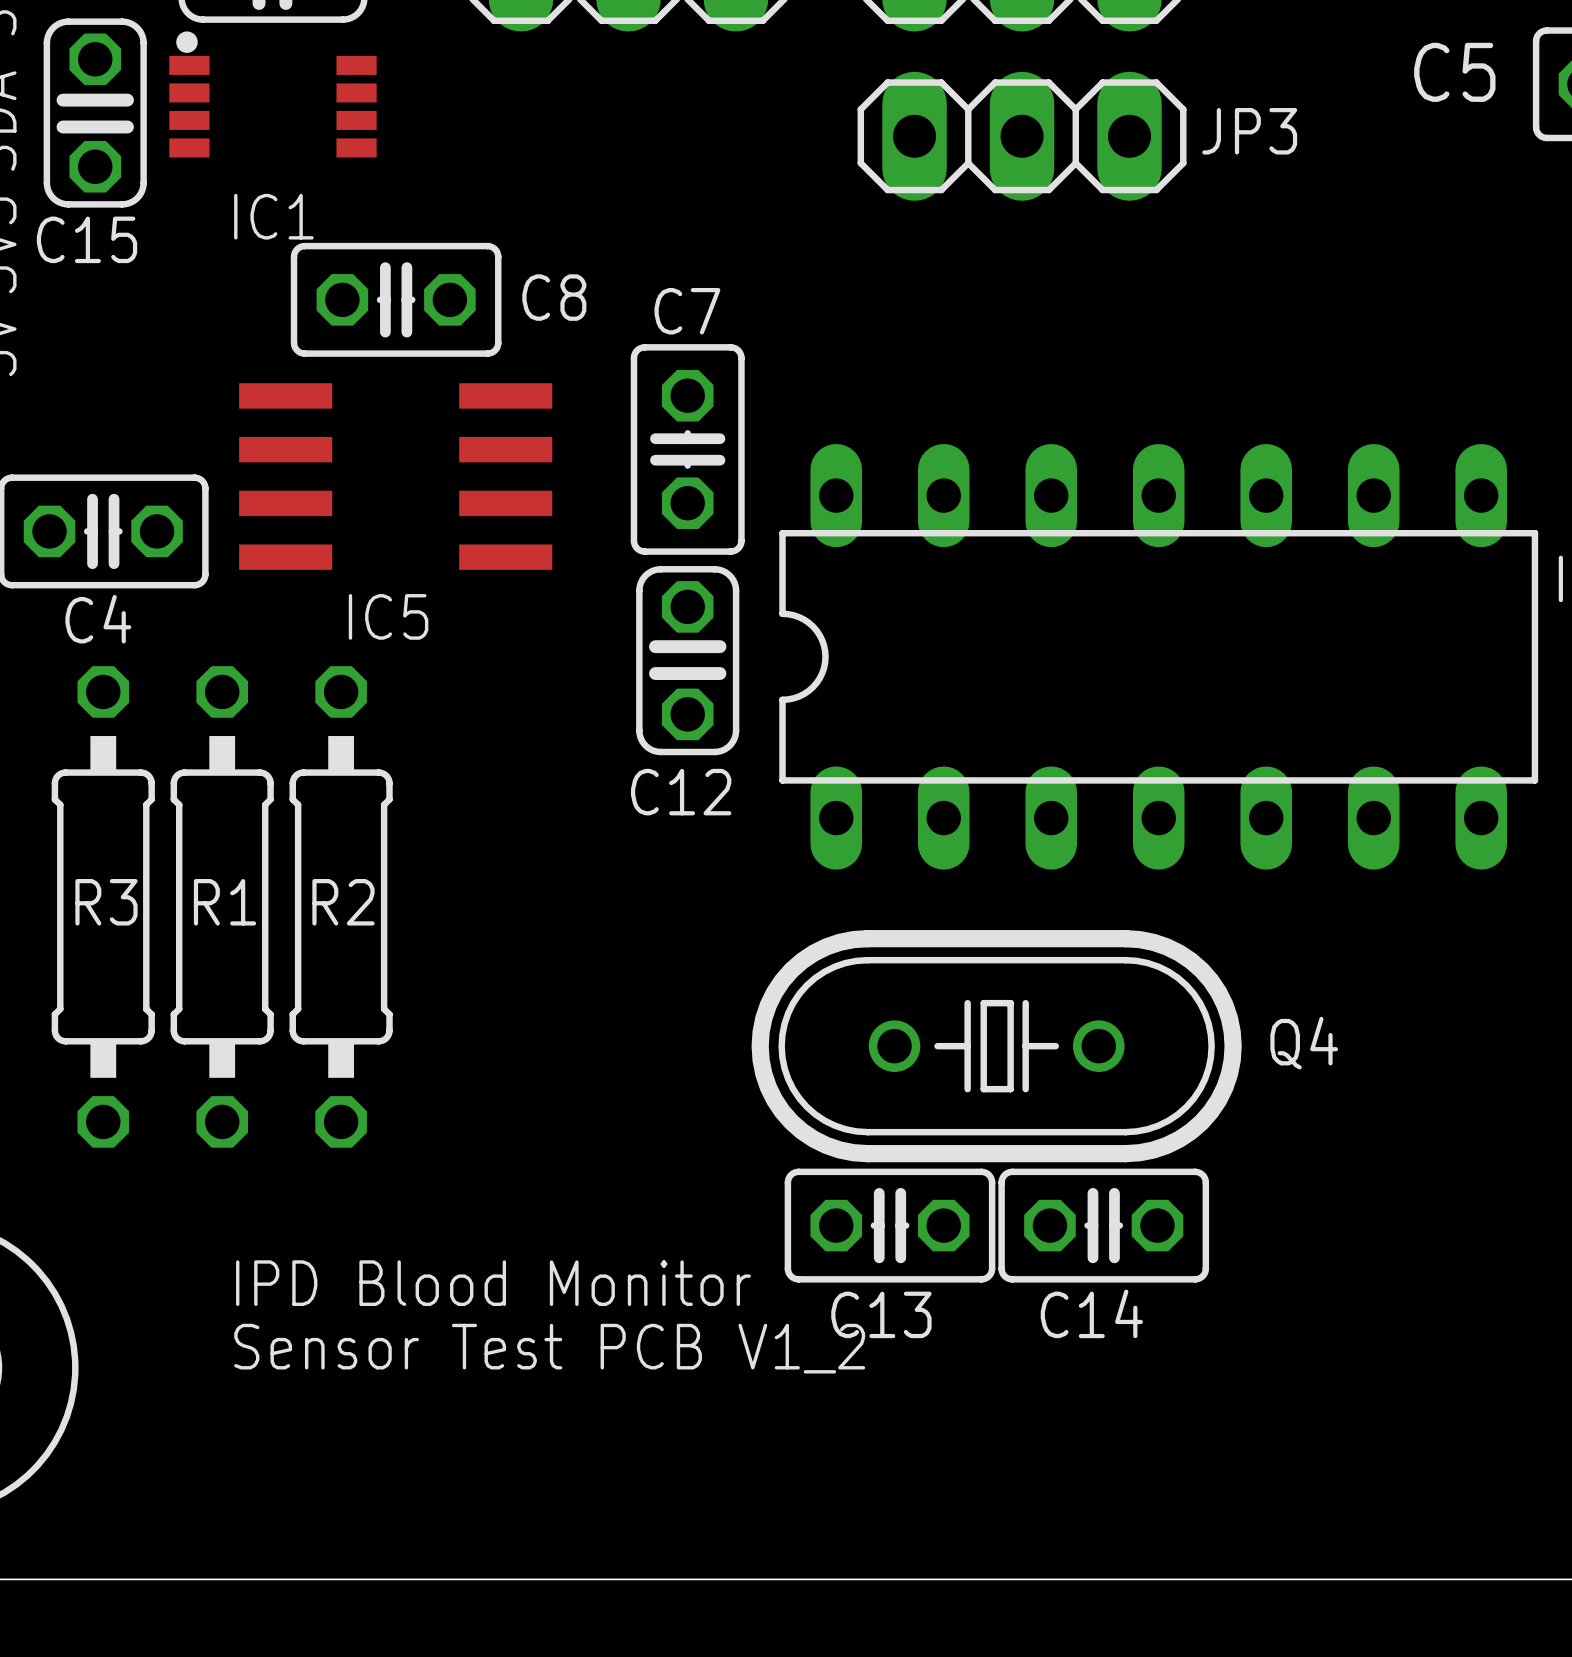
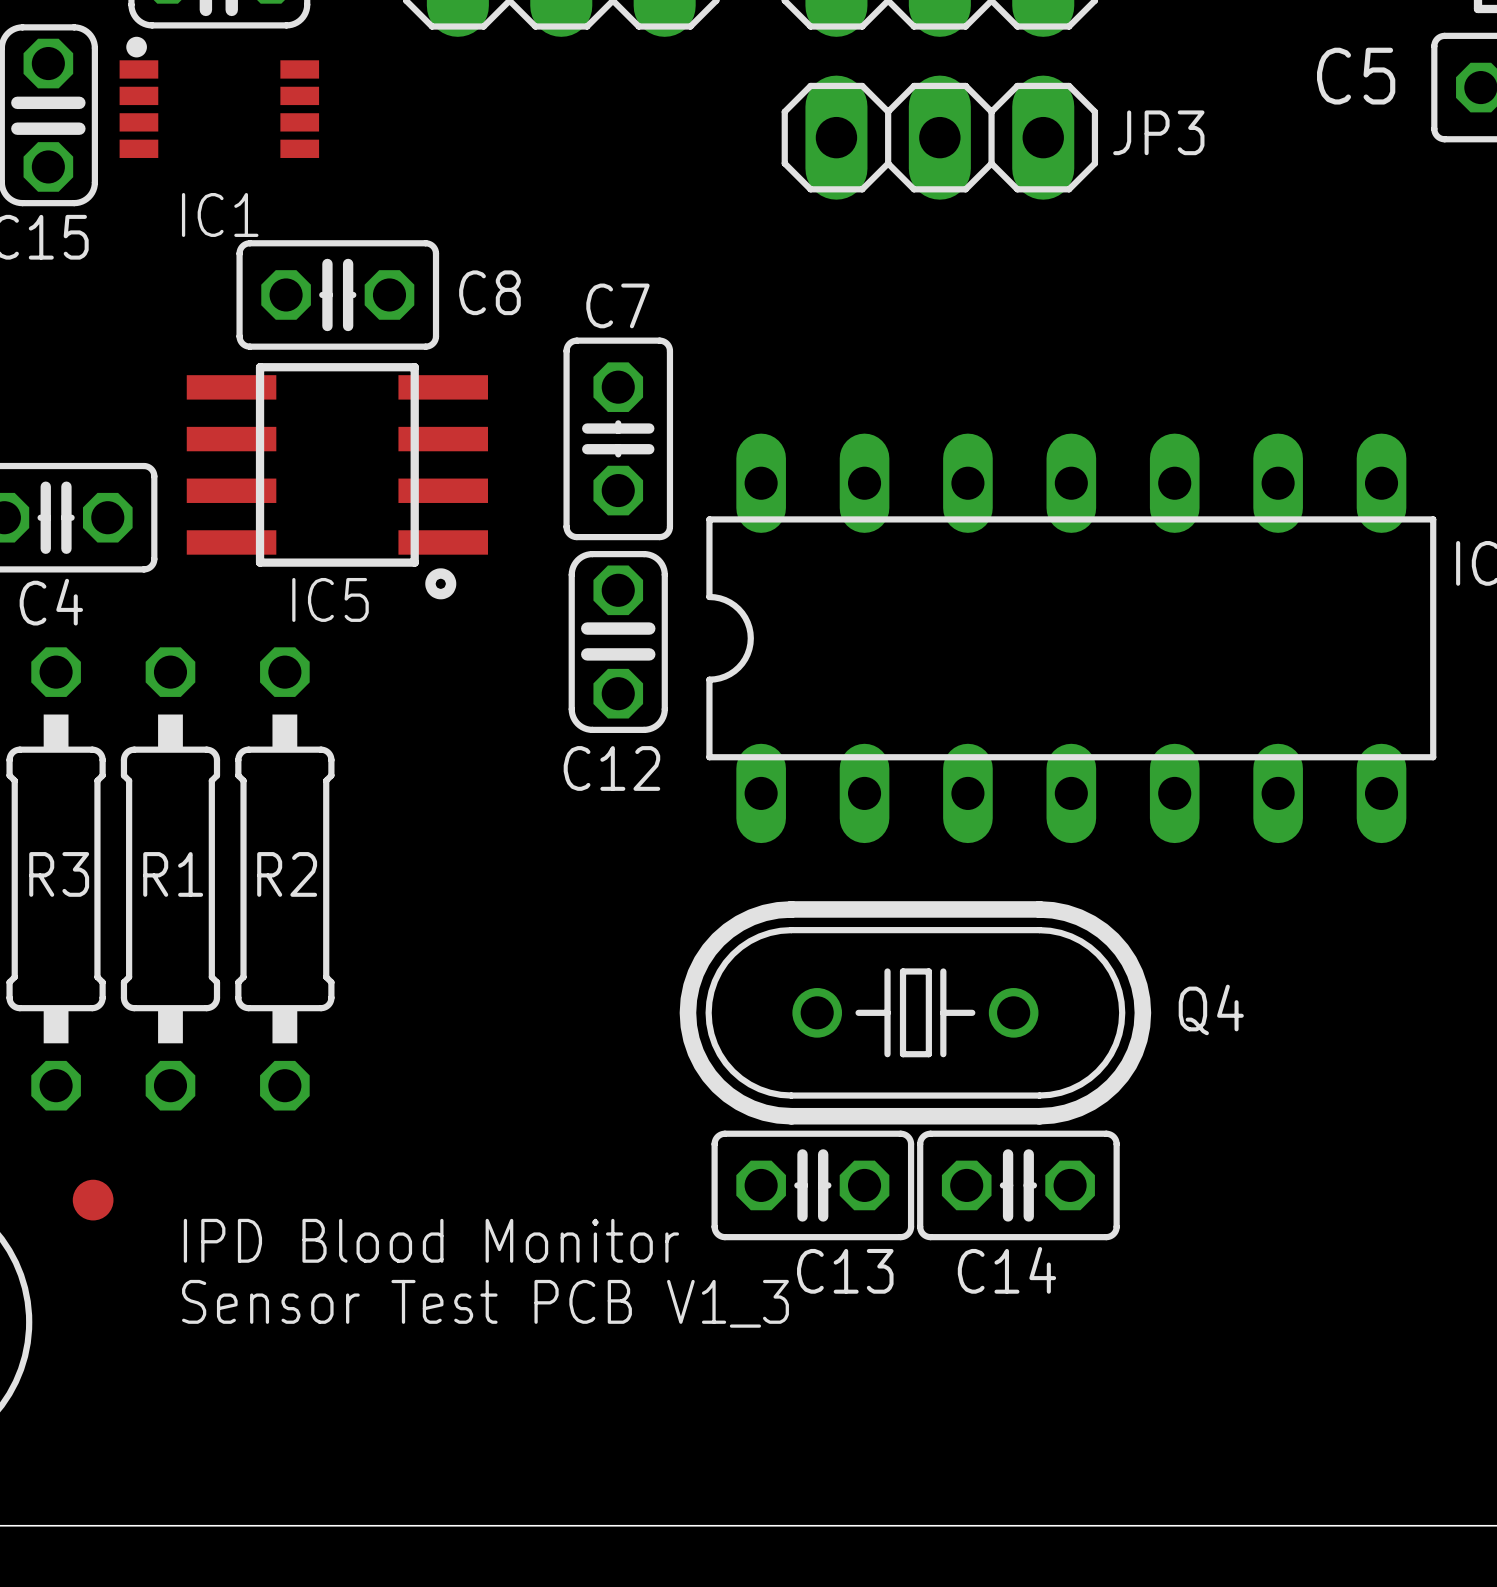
IC5 footprint: [239, 383, 553, 570] -> [186, 363, 489, 600]
part: none -> (93, 1200)
C13 name position: C13 (881, 1314) -> C13 (845, 1271)
text: Sensor Test PCB V1_2 (549, 1348) -> Sensor Test PCB V1_3 (485, 1303)

